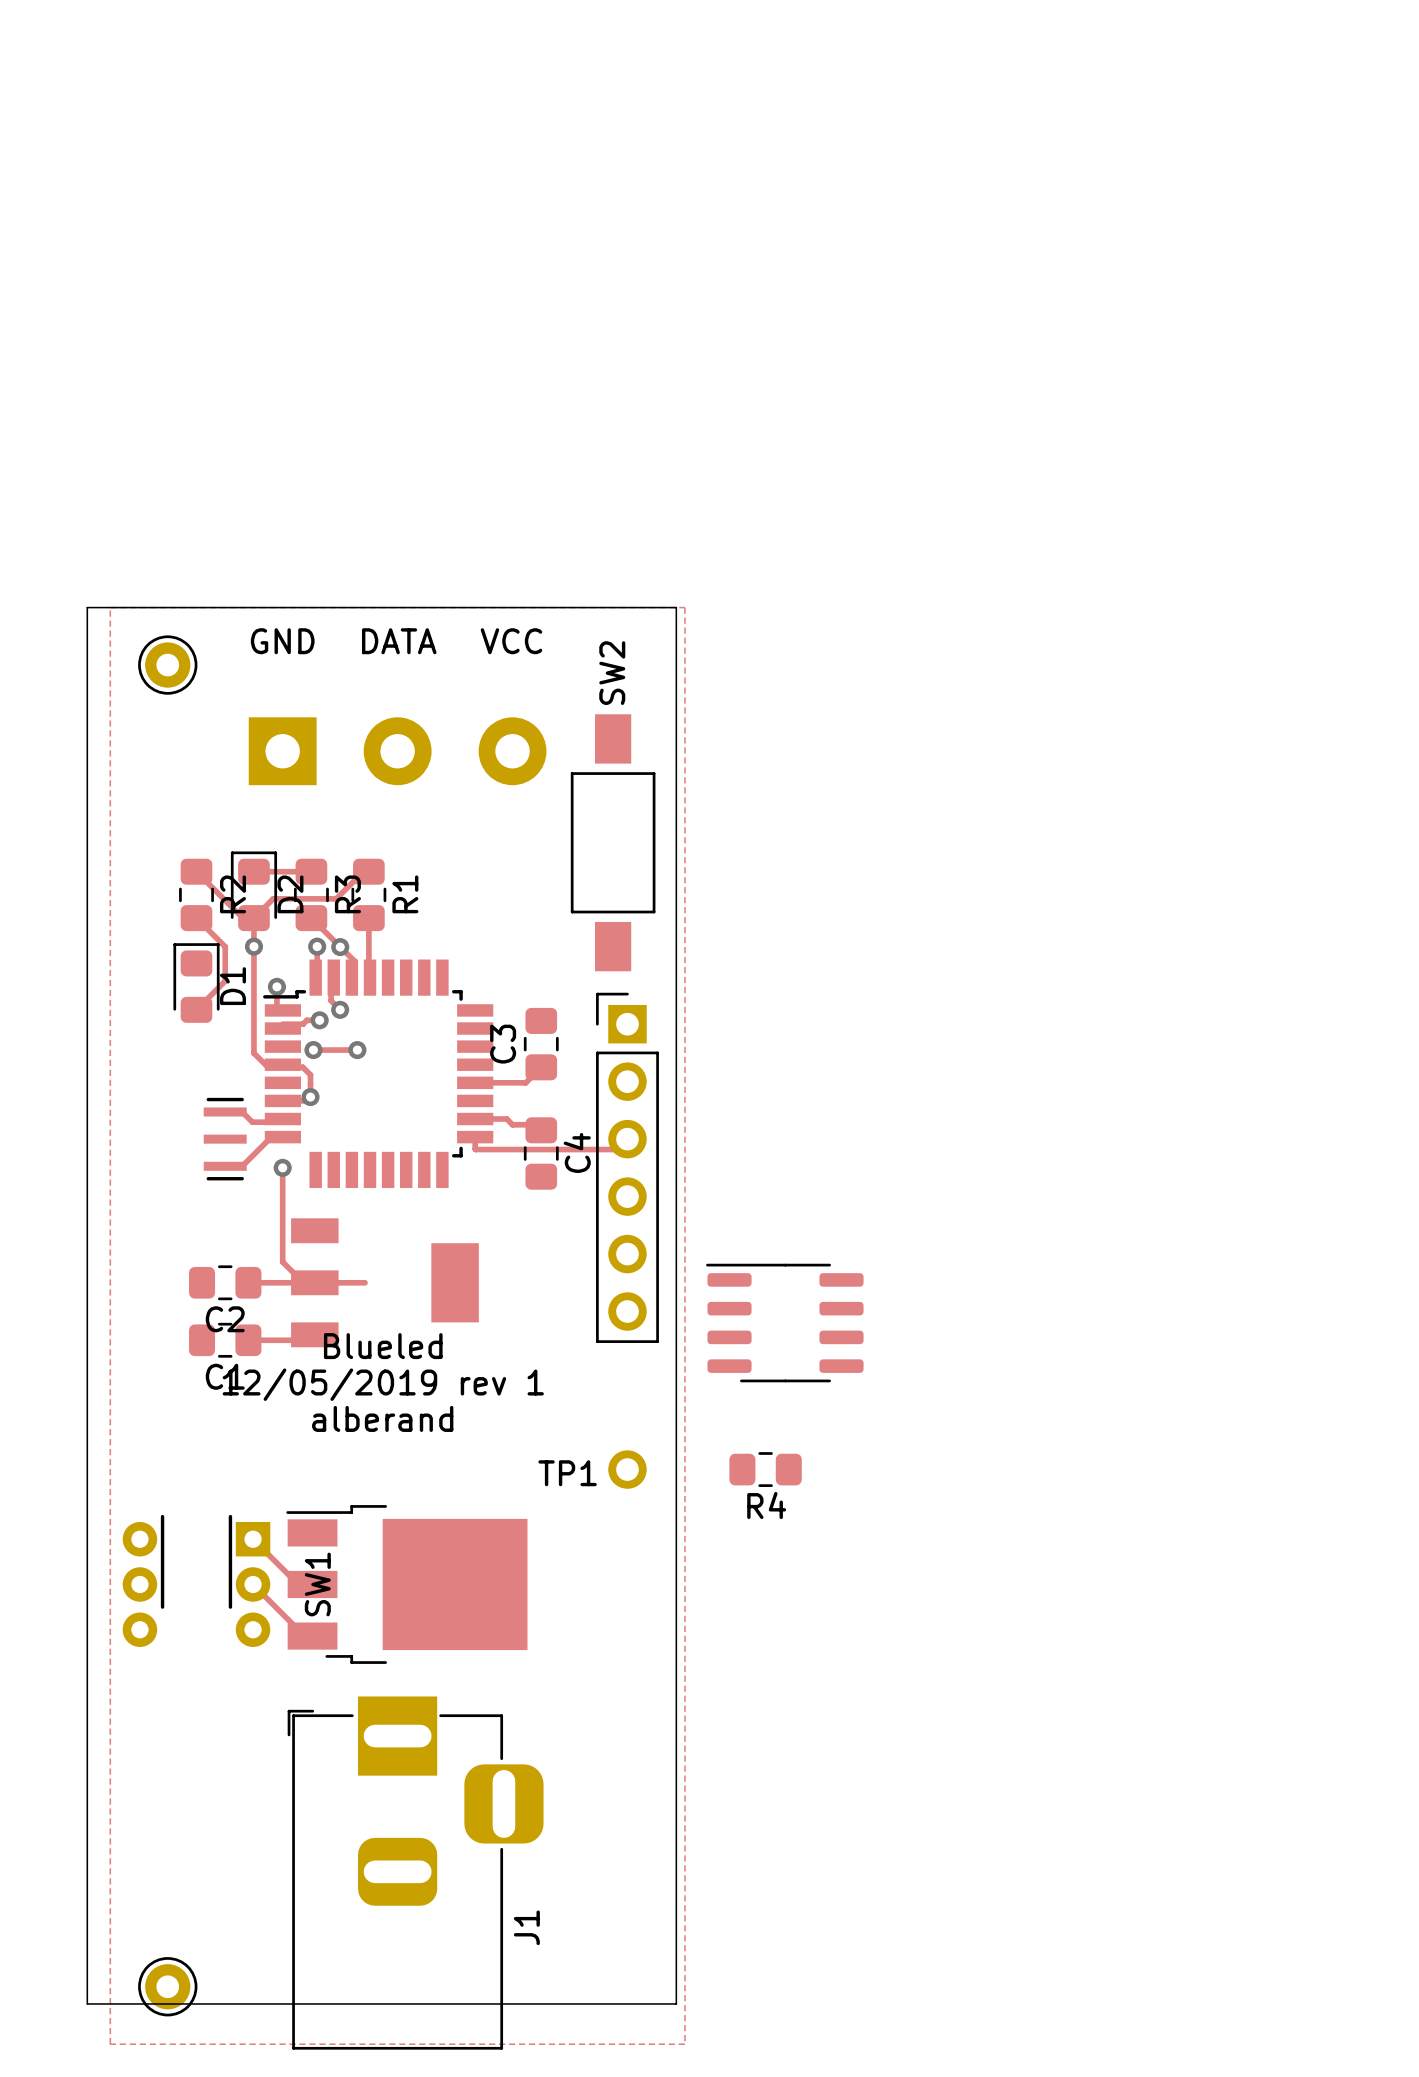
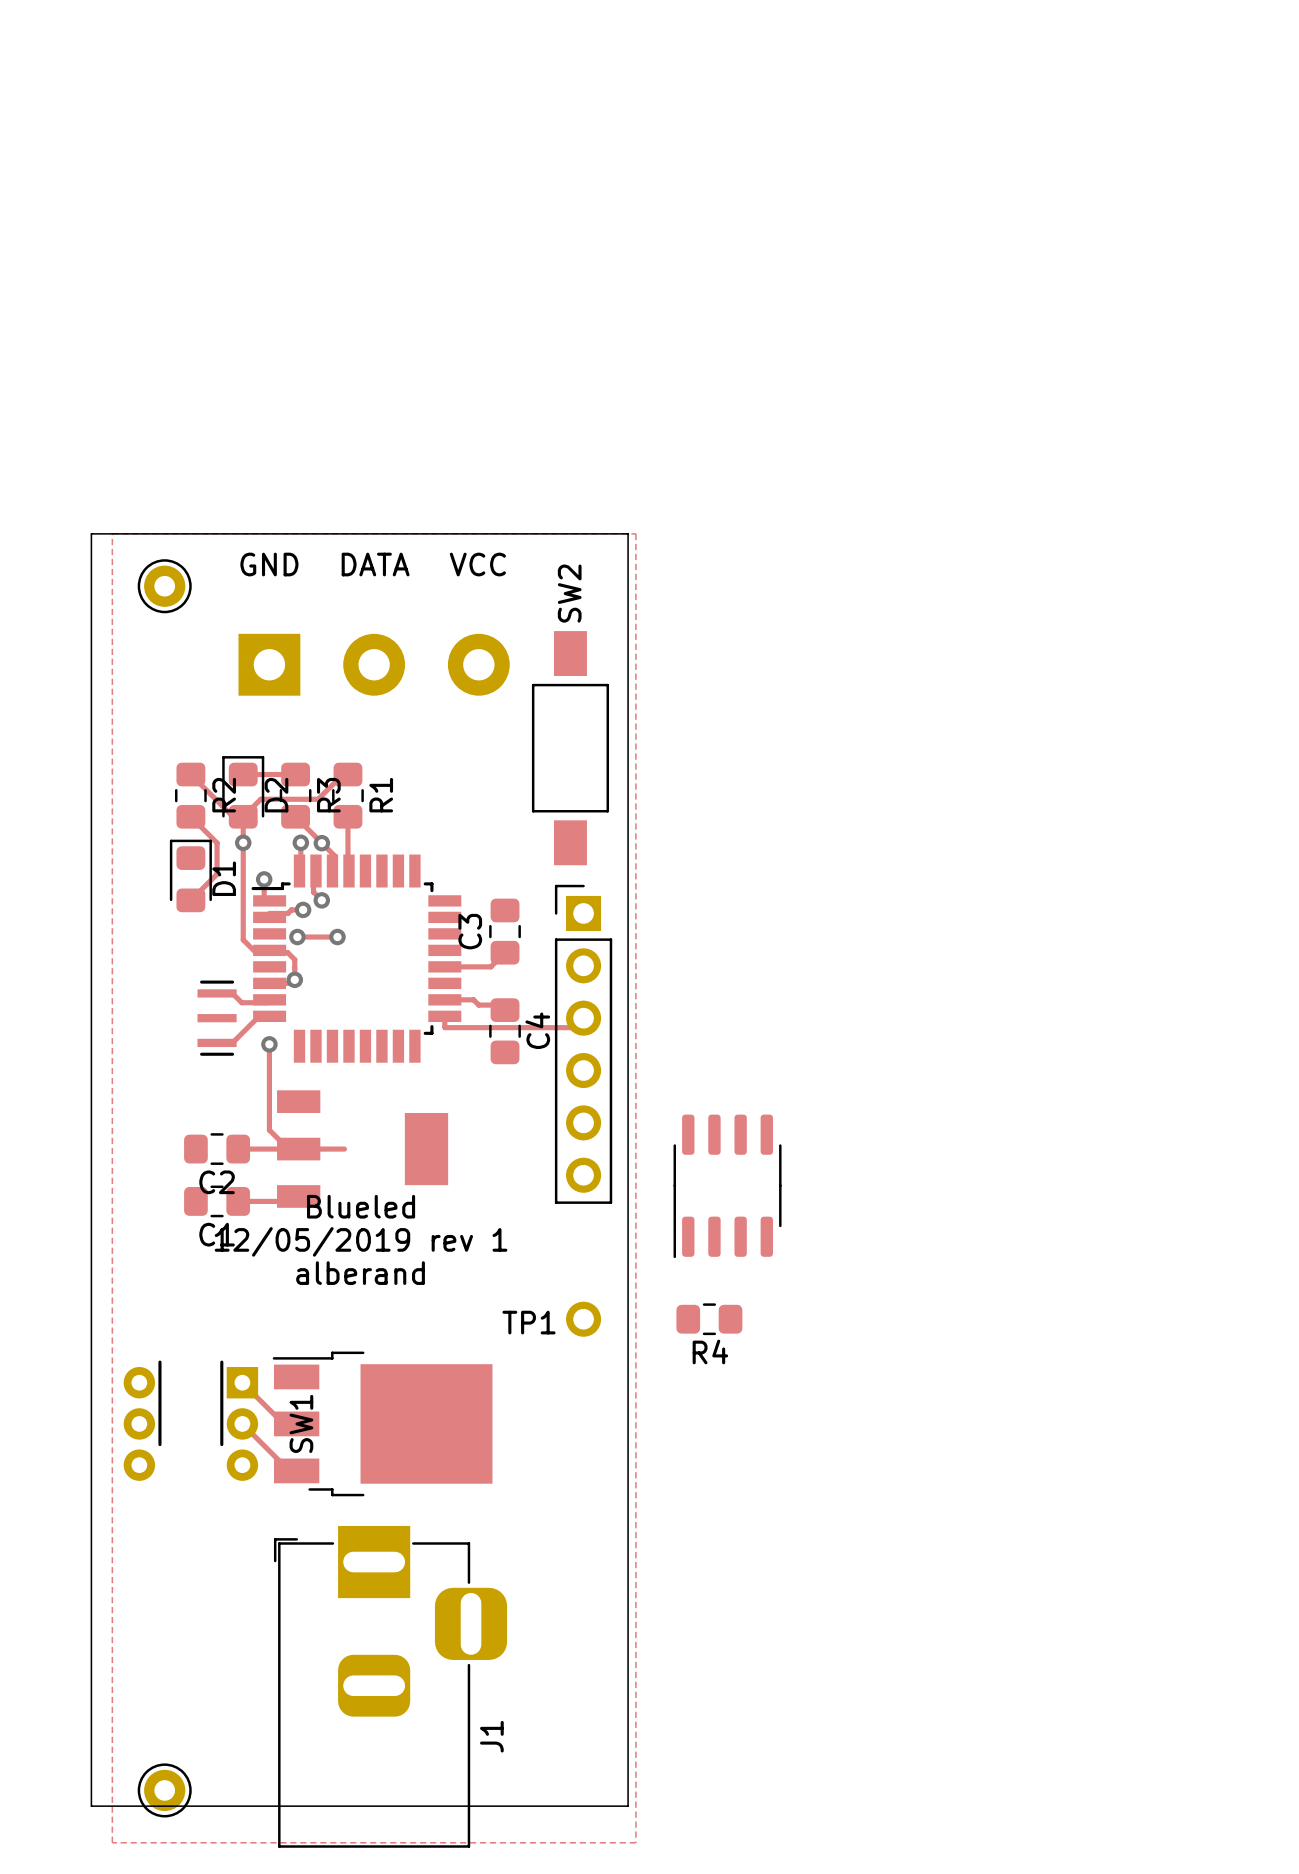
part rotation: 0° (784, 1323) -> 90° counterclockwise (727, 1186)

